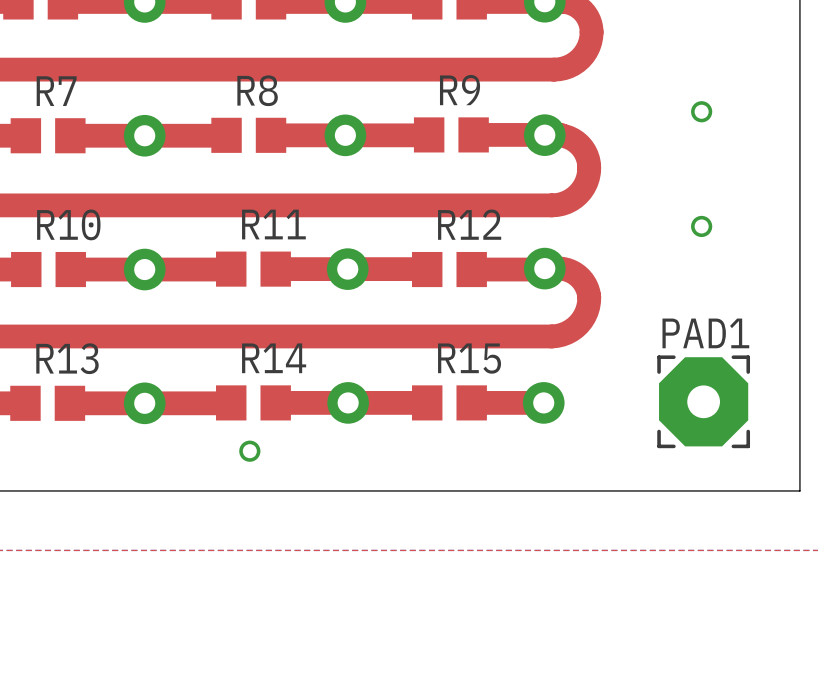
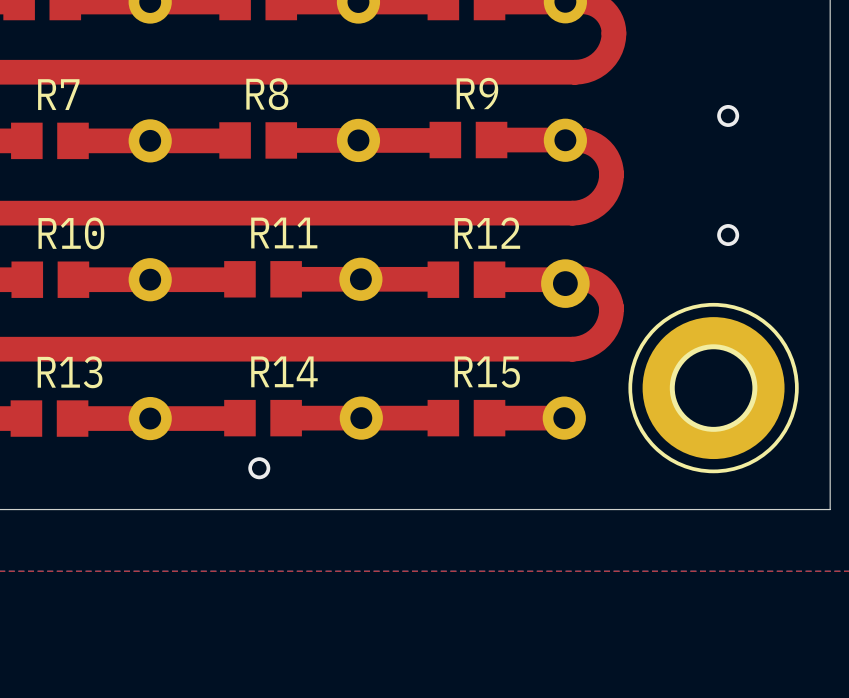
part footprint: [523, 247, 566, 290] -> [541, 259, 590, 308]
part: none -> (713, 388)
PAD1: (703, 401) -> none

